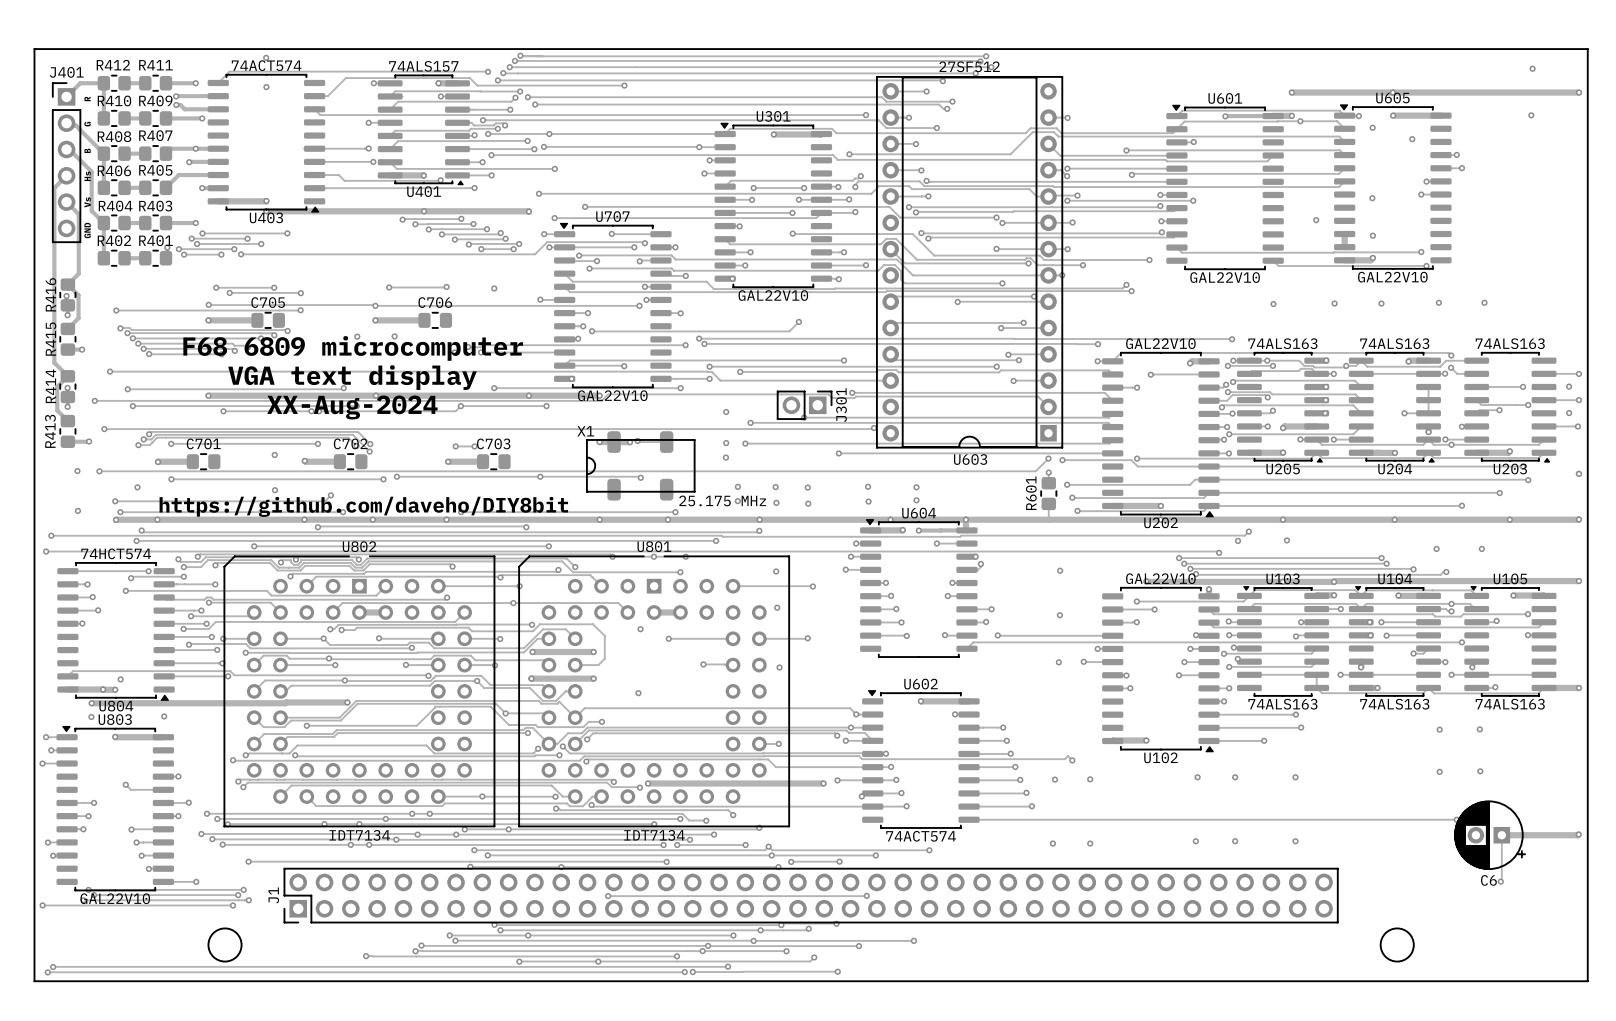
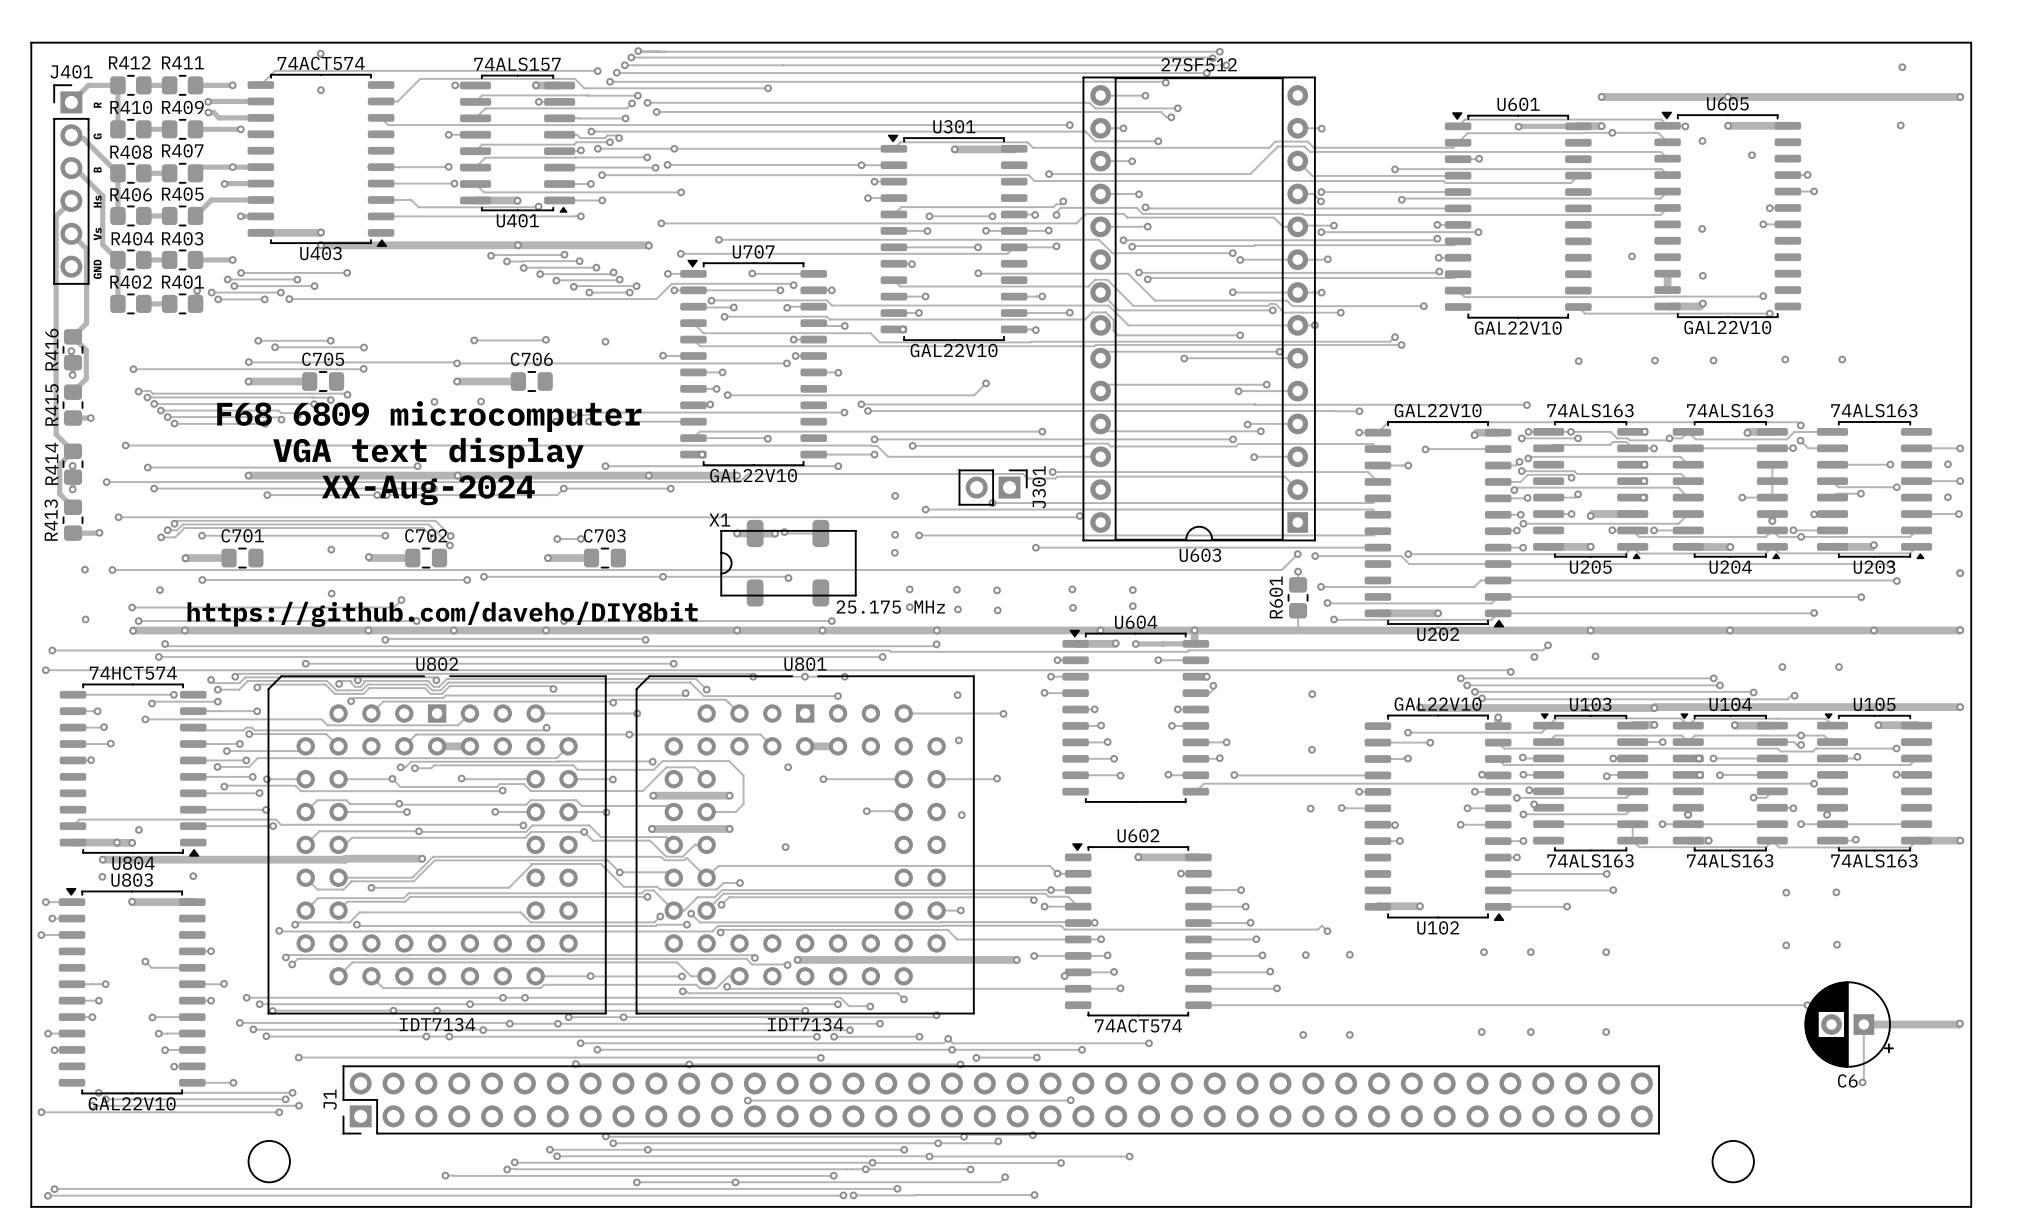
track: (548, 638) (537, 638) (523, 652) (245, 652) -> none
via: (245, 652) -> none

